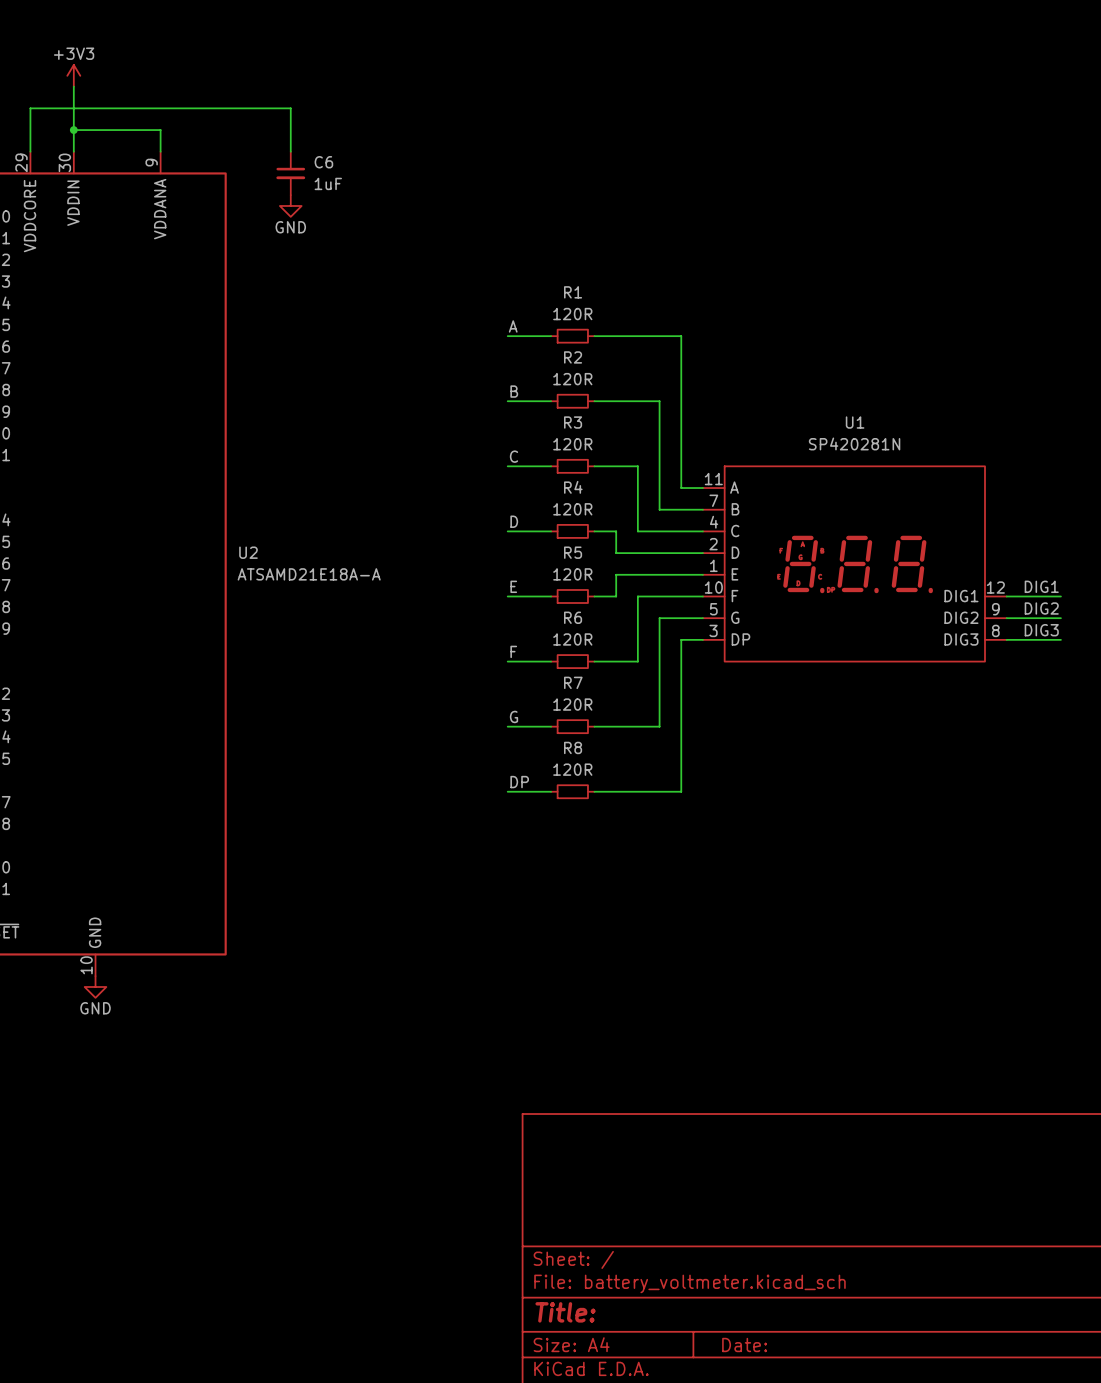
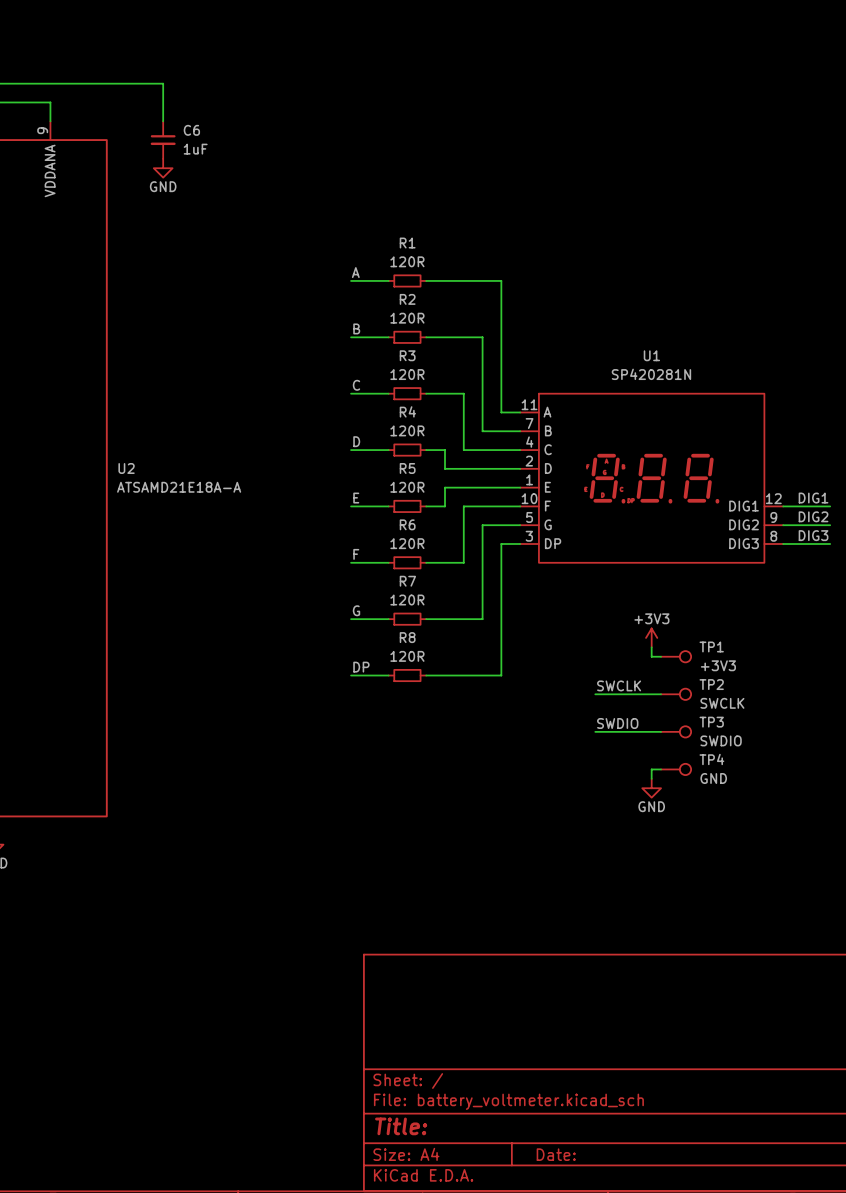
power symbol: none -> +3V3 (651, 637)
wire: none -> (651, 647) (651, 656) (661, 656)
TP1: none -> +3V3 (676, 656)
label: none -> SWCLK (619, 685)
wire: none -> (595, 694) (661, 694)
TP2: none -> SWCLK (676, 694)
label: none -> SWDIO (617, 723)
wire: none -> (595, 731) (661, 731)
TP3: none -> SWDIO (676, 731)
wire: none -> (661, 769) (651, 769) (651, 778)
TP4: none -> GND (676, 769)
power symbol: none -> GND (651, 788)

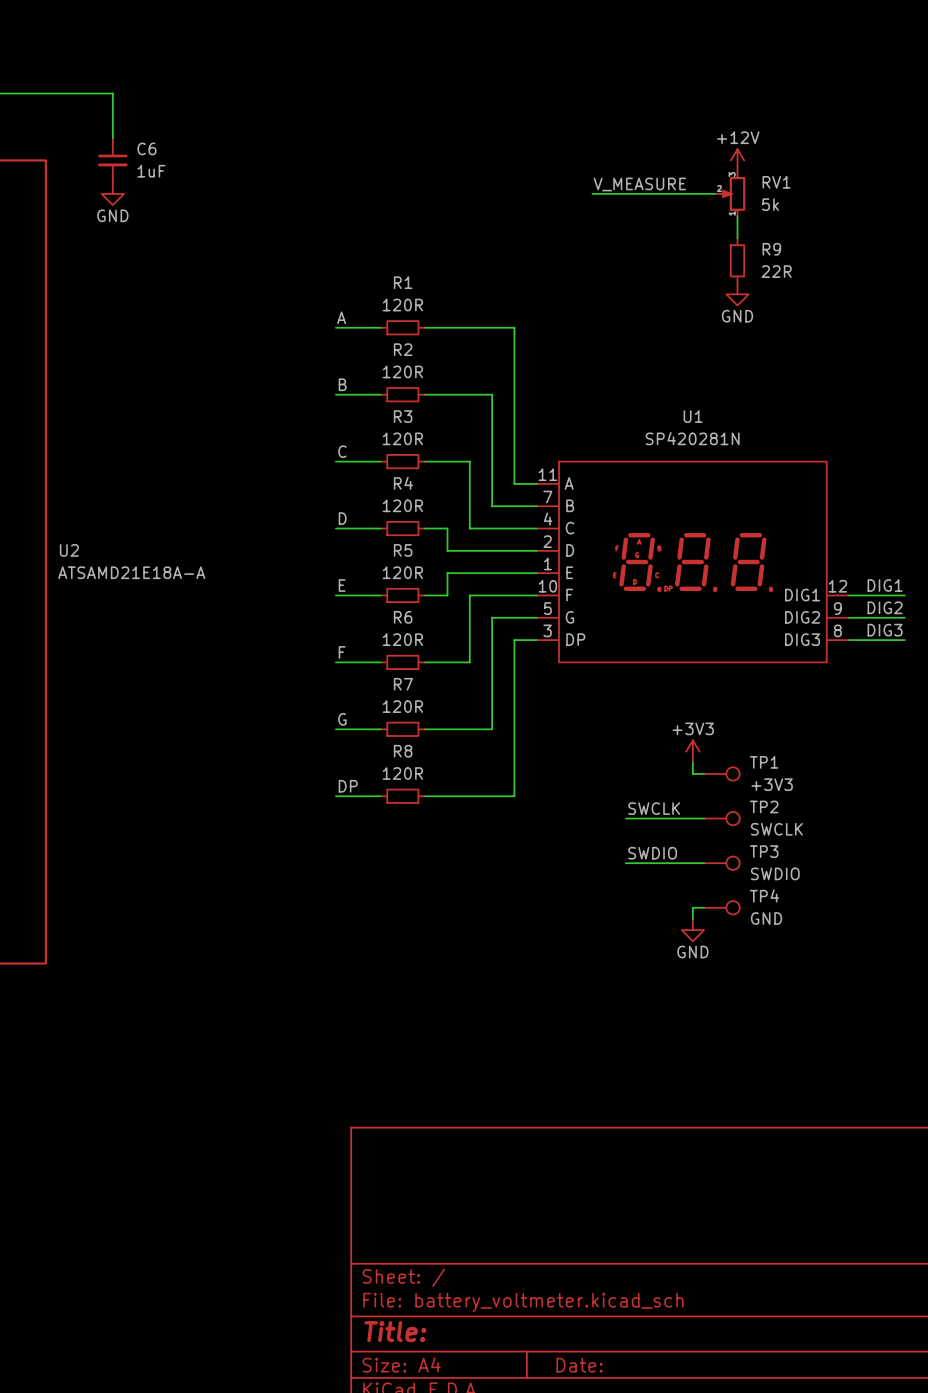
power symbol: none -> +12V (737, 160)
label: none -> V_MEASURE (639, 184)
wire: none -> (592, 193) (715, 193)
RV1: none -> 5k (730, 193)
wire: none -> (737, 216) (737, 238)
R9: none -> 22R (737, 260)
power symbol: none -> GND (737, 294)

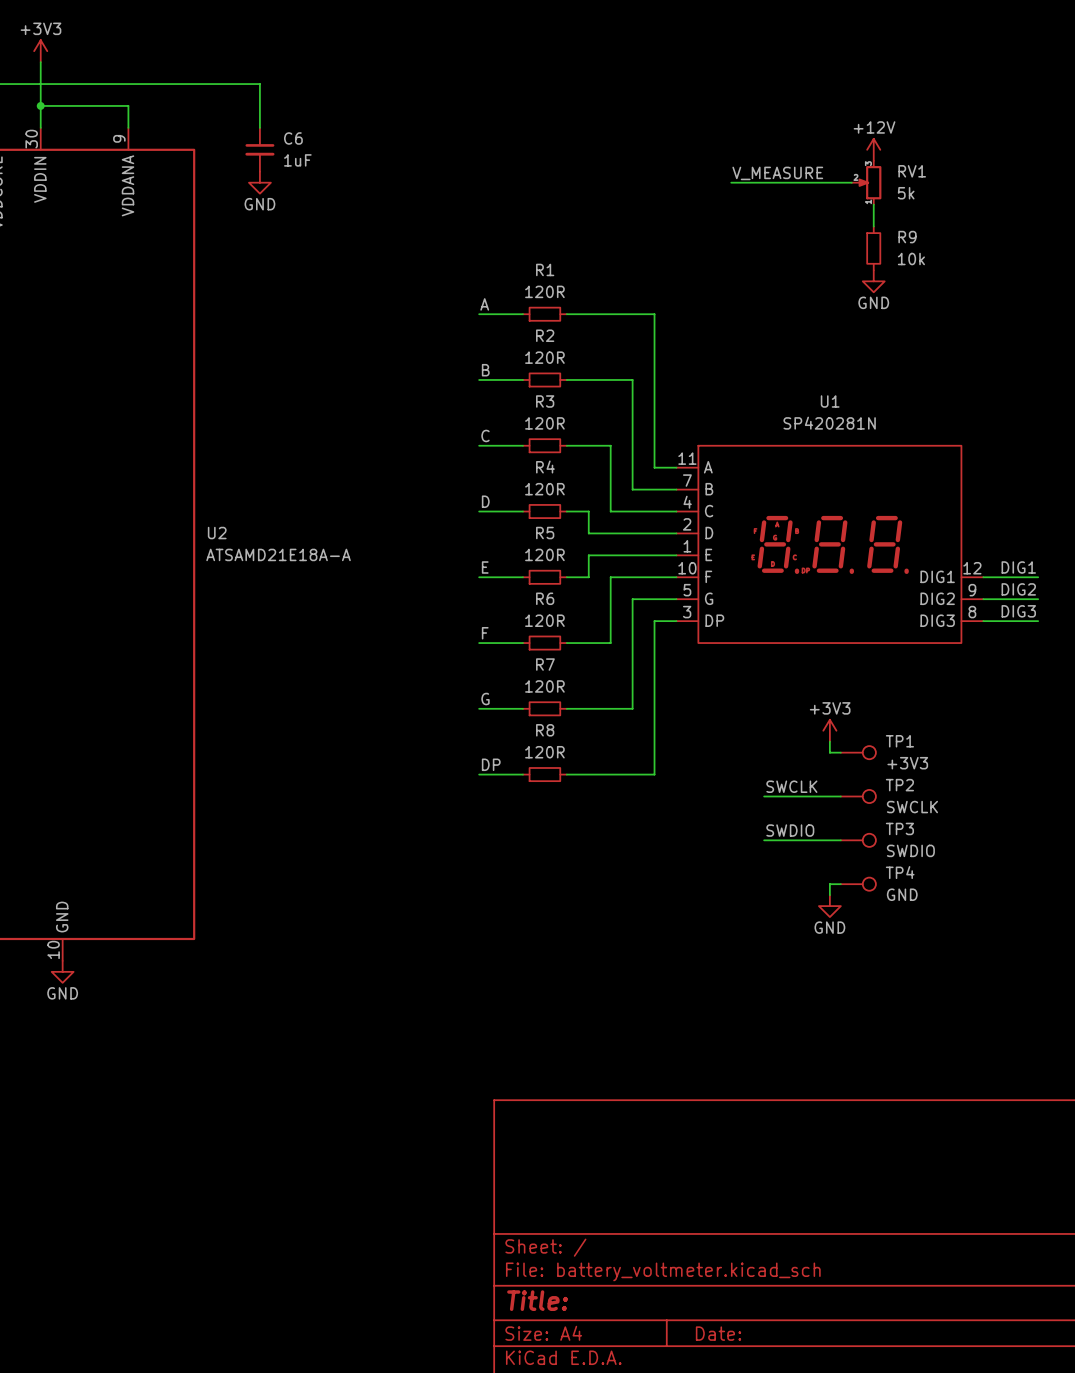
R9 value: 22R (776, 271) -> 10k (911, 259)

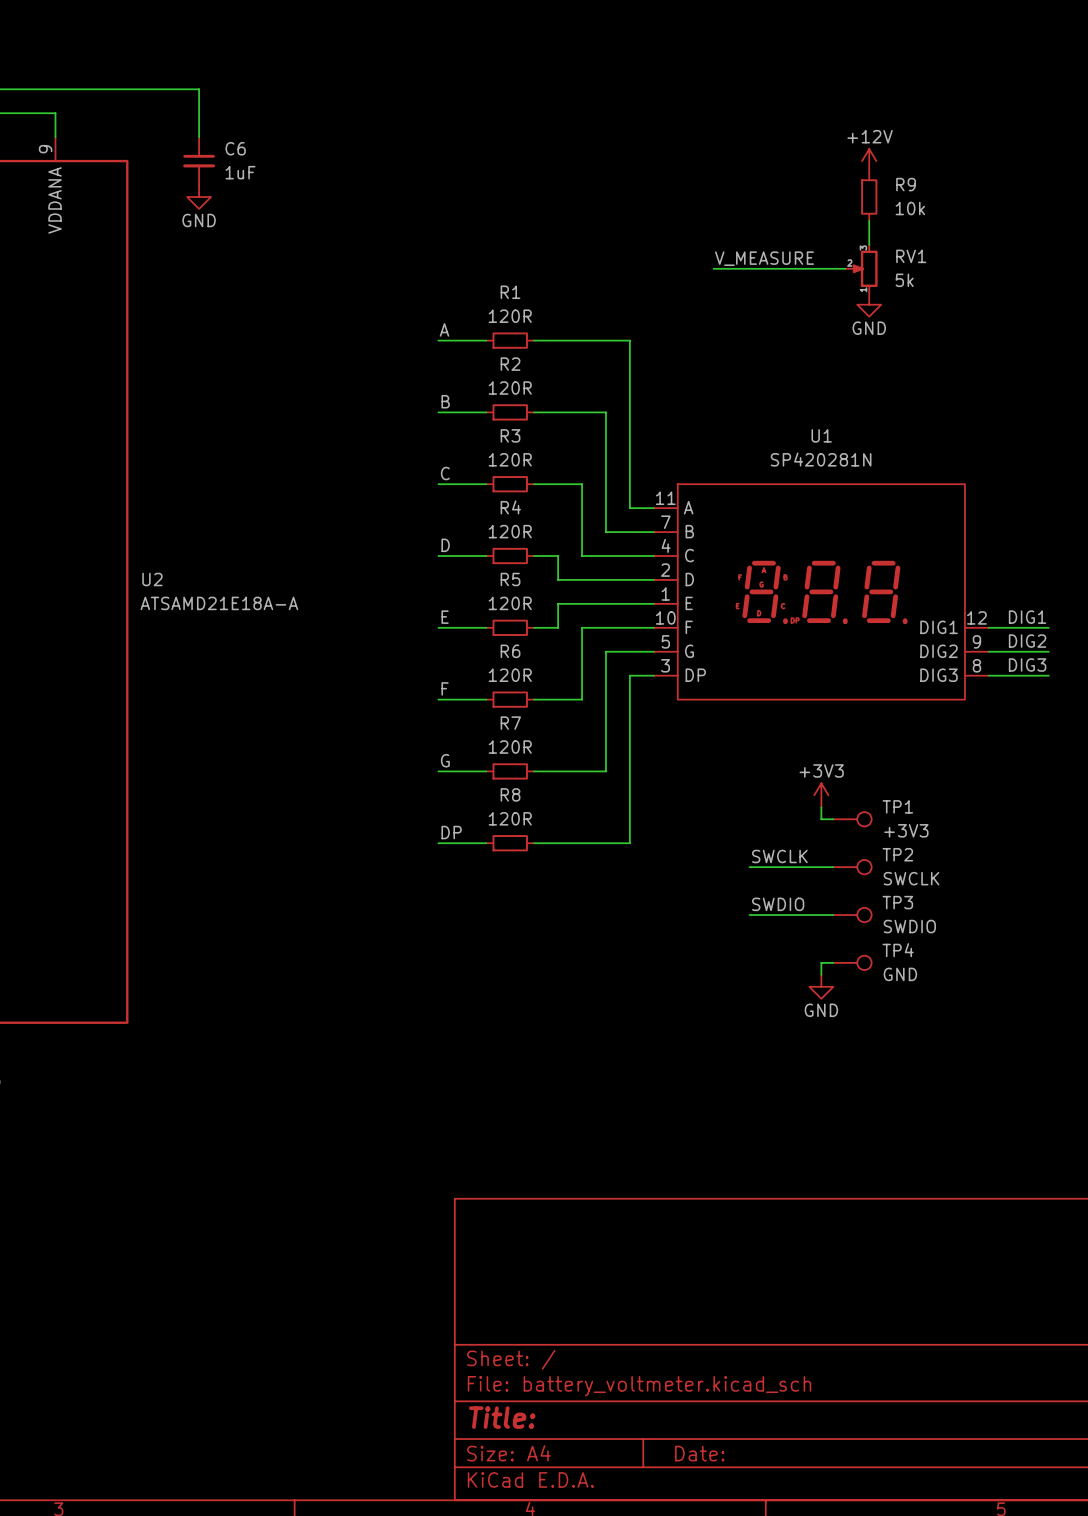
label position: V_MEASURE (777, 173) -> V_MEASURE (764, 258)
wire: (731, 182) (851, 182) -> (713, 268) (845, 268)
RV1 position: (866, 182) -> (861, 268)
R9 position: (873, 248) -> (869, 196)

